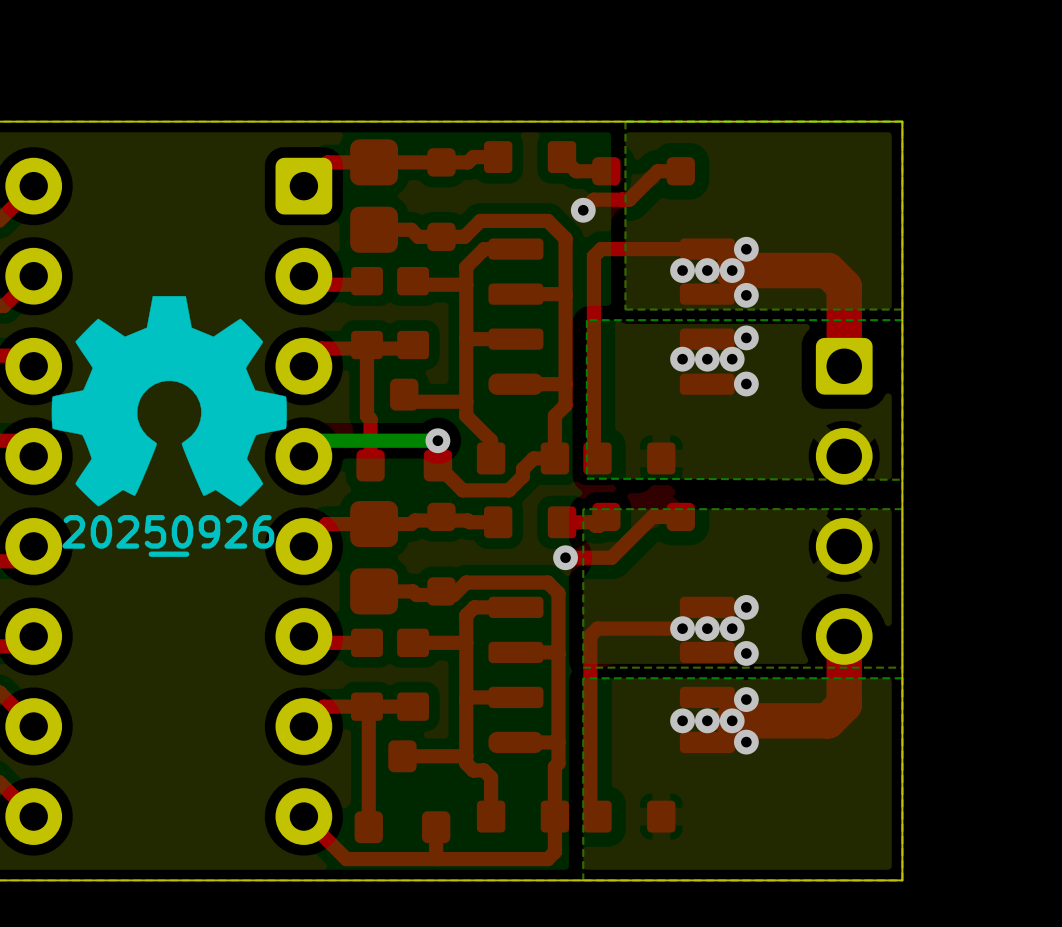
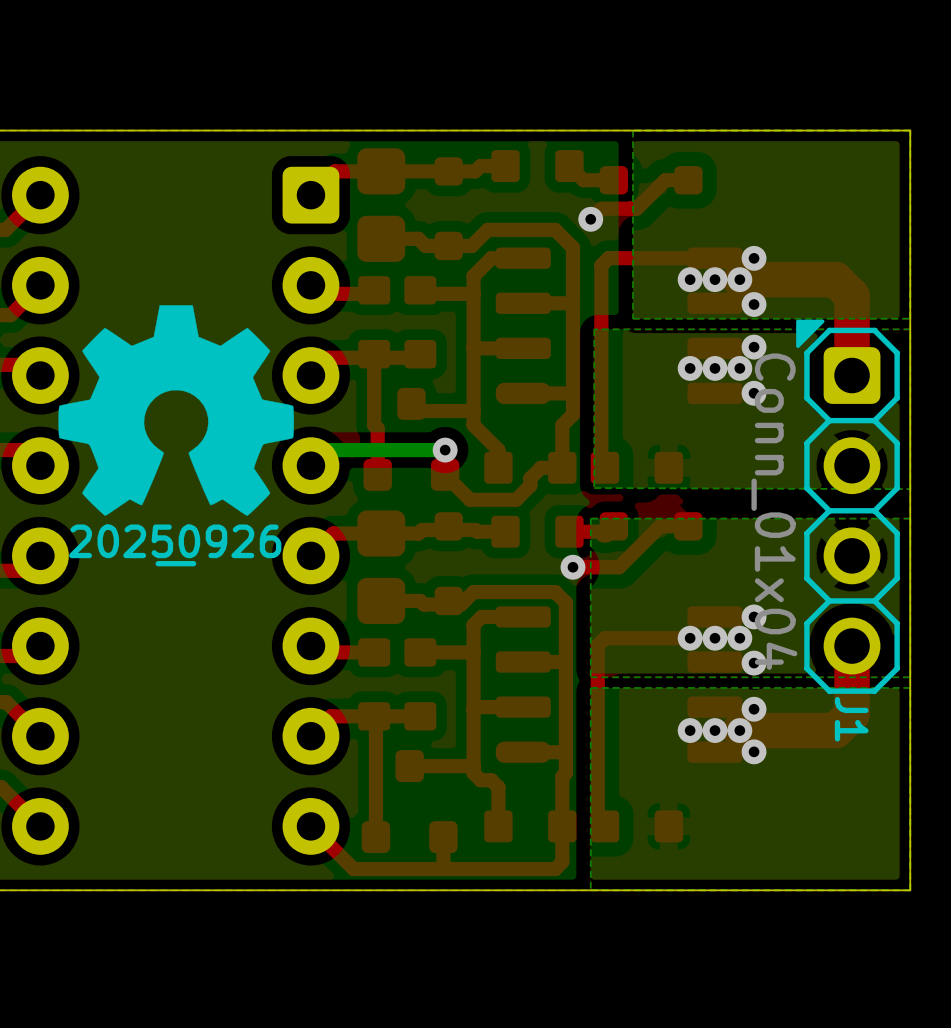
J1 side: top (844, 501) -> bottom (847, 506)

